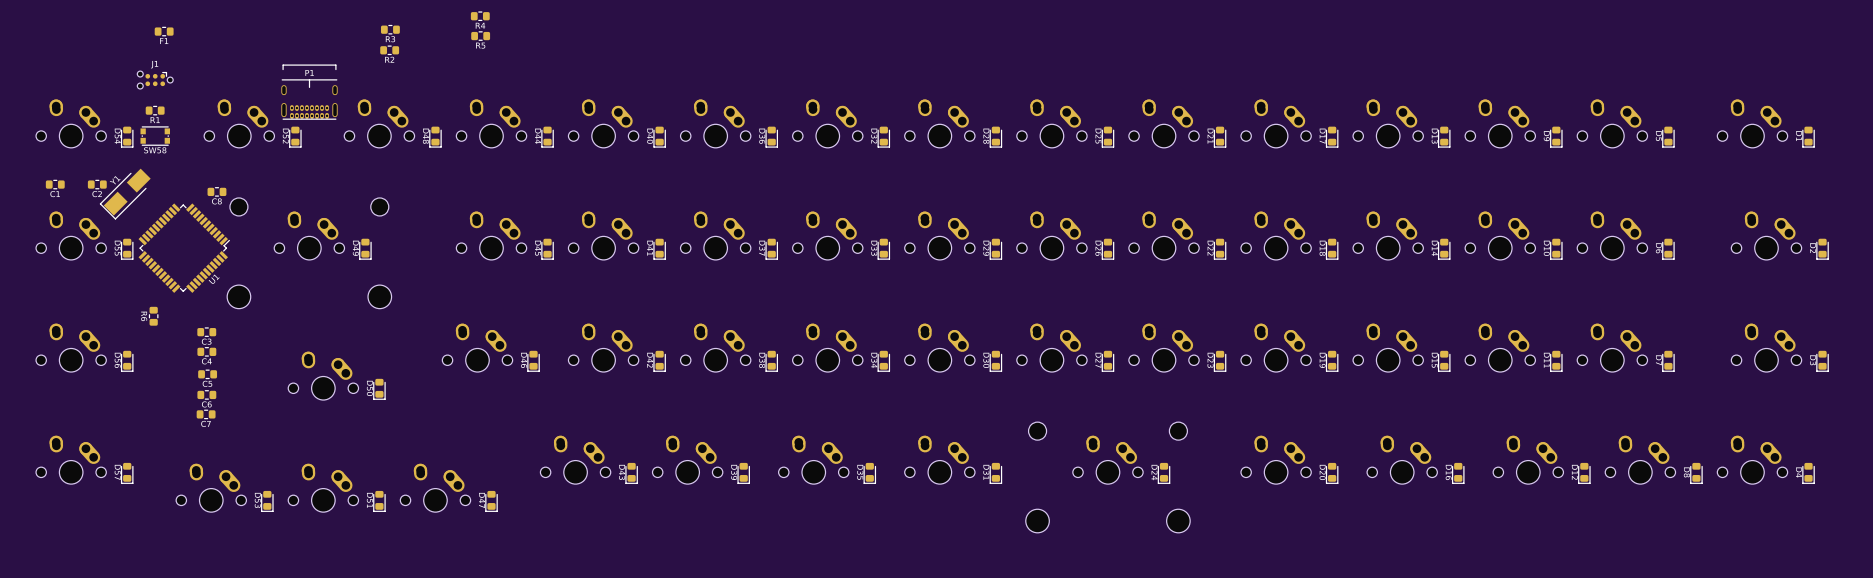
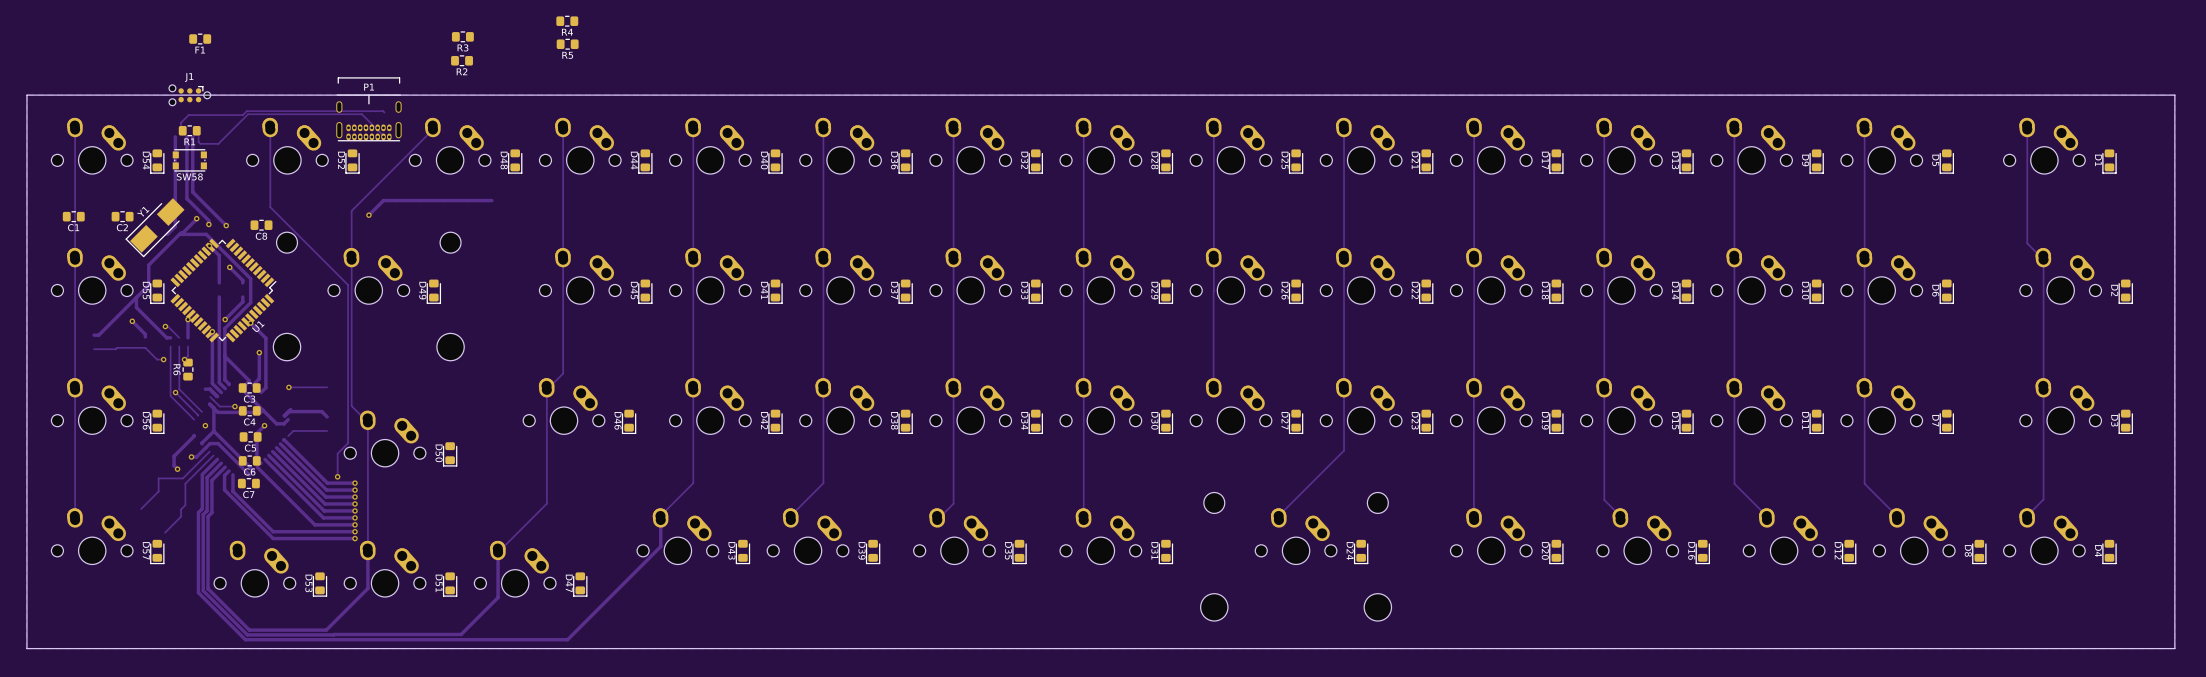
board edge: none -> (2174, 95) (2174, 648) (26, 648) (26, 95) (2174, 95)
track: none -> (384, 112) (246, 111) (242, 115) (188, 115) (181, 122) (181, 127)
track: none -> (75, 129) (75, 519)
track: none -> (270, 129) (270, 207) (348, 284) (348, 443) (337, 453) (337, 476)
track: none -> (433, 129) (351, 210) (351, 406) (367, 422) (367, 548)
track: none -> (563, 129) (562, 255)
track: none -> (693, 129) (693, 255)
track: none -> (823, 129) (823, 255)
track: none -> (953, 129) (953, 255)
track: none -> (1083, 129) (1083, 516)
track: none -> (1213, 129) (1213, 385)
track: none -> (1344, 129) (1343, 255)
track: none -> (1474, 129) (1473, 516)
track: none -> (1604, 129) (1604, 385)
track: none -> (1734, 129) (1734, 385)
track: none -> (1864, 129) (1864, 255)
track: none -> (2027, 129) (2027, 243) (2043, 259) (2043, 499) (2027, 516)
track: none -> (175, 136) (175, 226) (167, 234)
track: none -> (186, 136) (186, 198) (208, 220) (208, 224)
track: none -> (192, 136) (192, 192) (226, 225)
track: none -> (384, 136) (361, 114) (248, 114) (218, 143) (200, 143) (198, 136)
track: none -> (491, 200) (383, 200) (368, 215)
via: none -> (368, 215)
track: none -> (196, 219) (181, 234) (206, 234) (250, 278) (250, 302) (224, 328) (224, 379) (229, 384) (225, 381)
via: none -> (196, 218)
via: none -> (208, 224)
via: none -> (226, 225)
track: none -> (181, 232) (148, 265) (148, 285) (98, 335) (94, 335)
track: none -> (209, 245) (219, 255) (219, 282)
via: none -> (209, 245)
track: none -> (563, 259) (563, 373) (546, 389) (546, 503) (498, 552) (498, 597) (461, 634) (247, 634) (203, 590) (203, 514) (207, 510) (207, 477) (221, 463)
track: none -> (693, 259) (693, 385)
track: none -> (823, 259) (823, 483) (790, 516)
track: none -> (953, 259) (953, 385)
track: none -> (1344, 259) (1344, 450) (1278, 516)
track: none -> (1864, 259) (1864, 385)
track: none -> (229, 267) (242, 280) (242, 282)
via: none -> (229, 267)
track: none -> (219, 297) (219, 382) (225, 388)
track: none -> (242, 297) (242, 301) (225, 319)
track: none -> (136, 297) (136, 307) (166, 337) (170, 337)
track: none -> (188, 319) (188, 337)
via: none -> (188, 319)
via: none -> (225, 319)
track: none -> (132, 321) (145, 334) (145, 336)
via: none -> (132, 321)
track: none -> (250, 323) (265, 338) (265, 387) (261, 392)
via: none -> (250, 323)
track: none -> (165, 326) (167, 326) (179, 337)
via: none -> (165, 326)
track: none -> (212, 331) (212, 383) (221, 392)
via: none -> (212, 331)
track: none -> (170, 346) (170, 396) (194, 419)
track: none -> (179, 346) (179, 389) (201, 411)
track: none -> (188, 346) (188, 356) (184, 359)
track: none -> (94, 349) (145, 347) (157, 359) (163, 359)
track: none -> (259, 352) (259, 378) (253, 384)
via: none -> (259, 352)
track: none -> (224, 356) (249, 380) (245, 385) (245, 392) (276, 423) (284, 423) (288, 419)
via: none -> (163, 359)
via: none -> (184, 359)
via: none -> (288, 387)
track: none -> (327, 387) (288, 387)
track: none -> (205, 389) (210, 389) (217, 396) (211, 390)
track: none -> (693, 389) (693, 483) (660, 516)
track: none -> (953, 389) (953, 503) (937, 519)
track: none -> (1604, 389) (1604, 500) (1620, 516)
track: none -> (1734, 389) (1734, 483) (1766, 516)
track: none -> (1864, 389) (1864, 483) (1896, 516)
track: none -> (175, 392) (198, 415)
via: none -> (175, 392)
track: none -> (210, 396) (219, 406) (234, 406)
track: none -> (209, 404) (217, 412) (260, 412) (262, 410)
via: none -> (234, 406)
track: none -> (213, 408) (213, 431)
track: none -> (290, 409) (284, 415) (289, 411) (321, 411) (327, 416)
via: none -> (205, 425)
track: none -> (264, 425) (256, 433) (256, 459) (261, 463)
via: none -> (264, 425)
track: none -> (213, 431) (253, 470)
track: none -> (213, 431) (201, 443)
track: none -> (327, 430) (293, 430) (288, 436)
track: none -> (194, 435) (174, 456) (174, 465) (177, 469)
track: none -> (284, 439) (327, 483) (355, 483)
track: none -> (280, 443) (326, 490) (355, 490)
track: none -> (276, 447) (325, 497) (355, 497)
track: none -> (209, 451) (182, 478) (158, 478) (158, 491) (141, 508)
track: none -> (272, 451) (325, 503) (355, 503)
track: none -> (213, 455) (185, 483) (185, 505) (181, 509) (181, 516) (164, 532)
track: none -> (268, 455) (324, 510) (355, 510)
track: none -> (191, 457) (196, 457) (210, 443) (218, 443) (249, 474)
via: none -> (191, 457)
track: none -> (217, 459) (202, 474) (202, 508) (198, 512) (198, 592) (245, 639) (567, 639) (660, 546) (660, 519)
track: none -> (264, 459) (323, 517) (355, 517)
track: none -> (225, 467) (211, 480) (211, 512) (208, 516) (208, 588) (249, 630) (326, 630) (367, 588) (367, 552)
track: none -> (257, 467) (314, 524) (355, 524)
via: none -> (177, 469)
track: none -> (229, 470) (224, 475) (224, 489) (273, 538) (355, 538)
track: none -> (232, 474) (232, 491) (273, 531) (355, 531)
via: none -> (337, 476)
via: none -> (355, 483)
via: none -> (355, 490)
via: none -> (355, 497)
via: none -> (355, 503)
via: none -> (355, 510)
via: none -> (355, 517)
via: none -> (355, 524)
via: none -> (355, 531)
via: none -> (355, 538)

